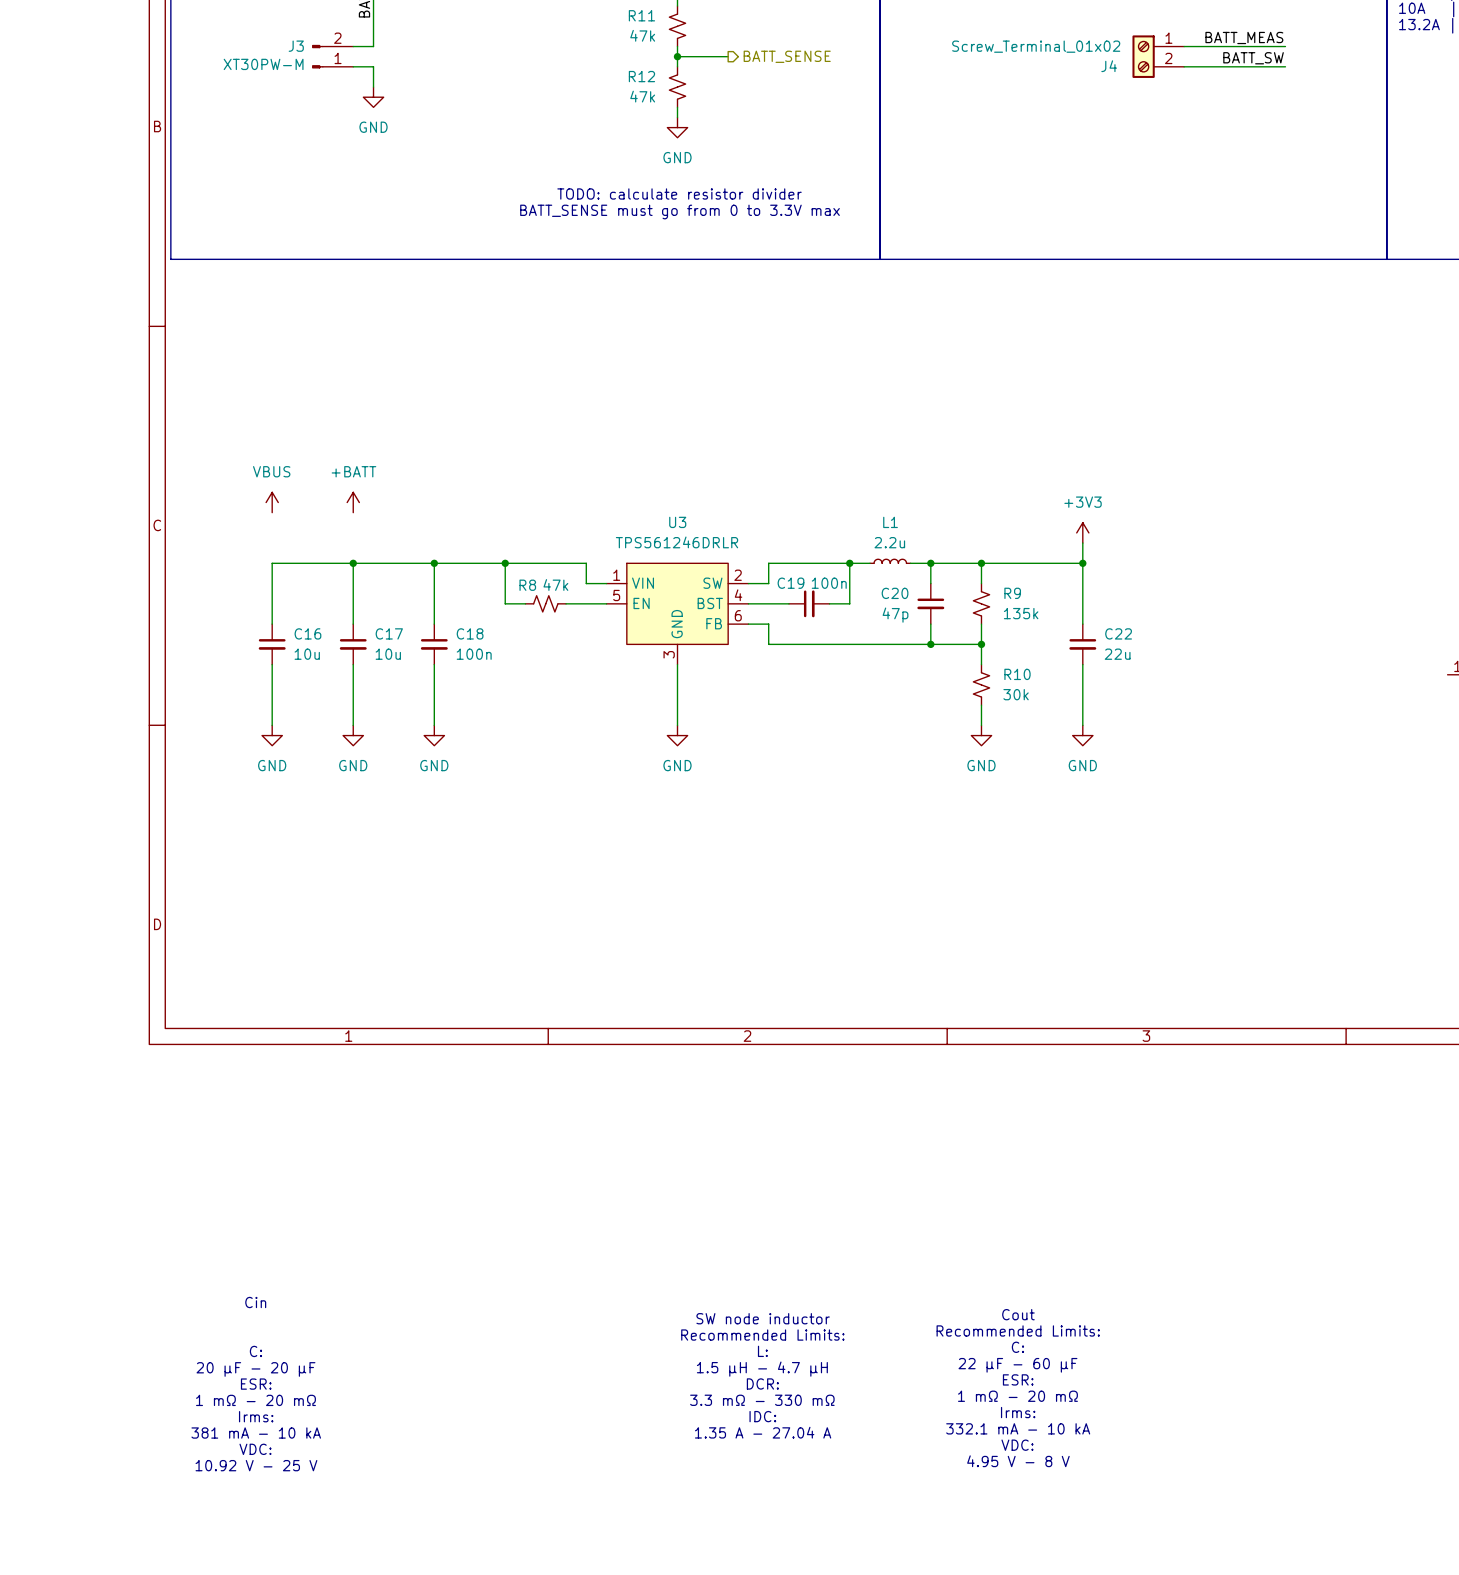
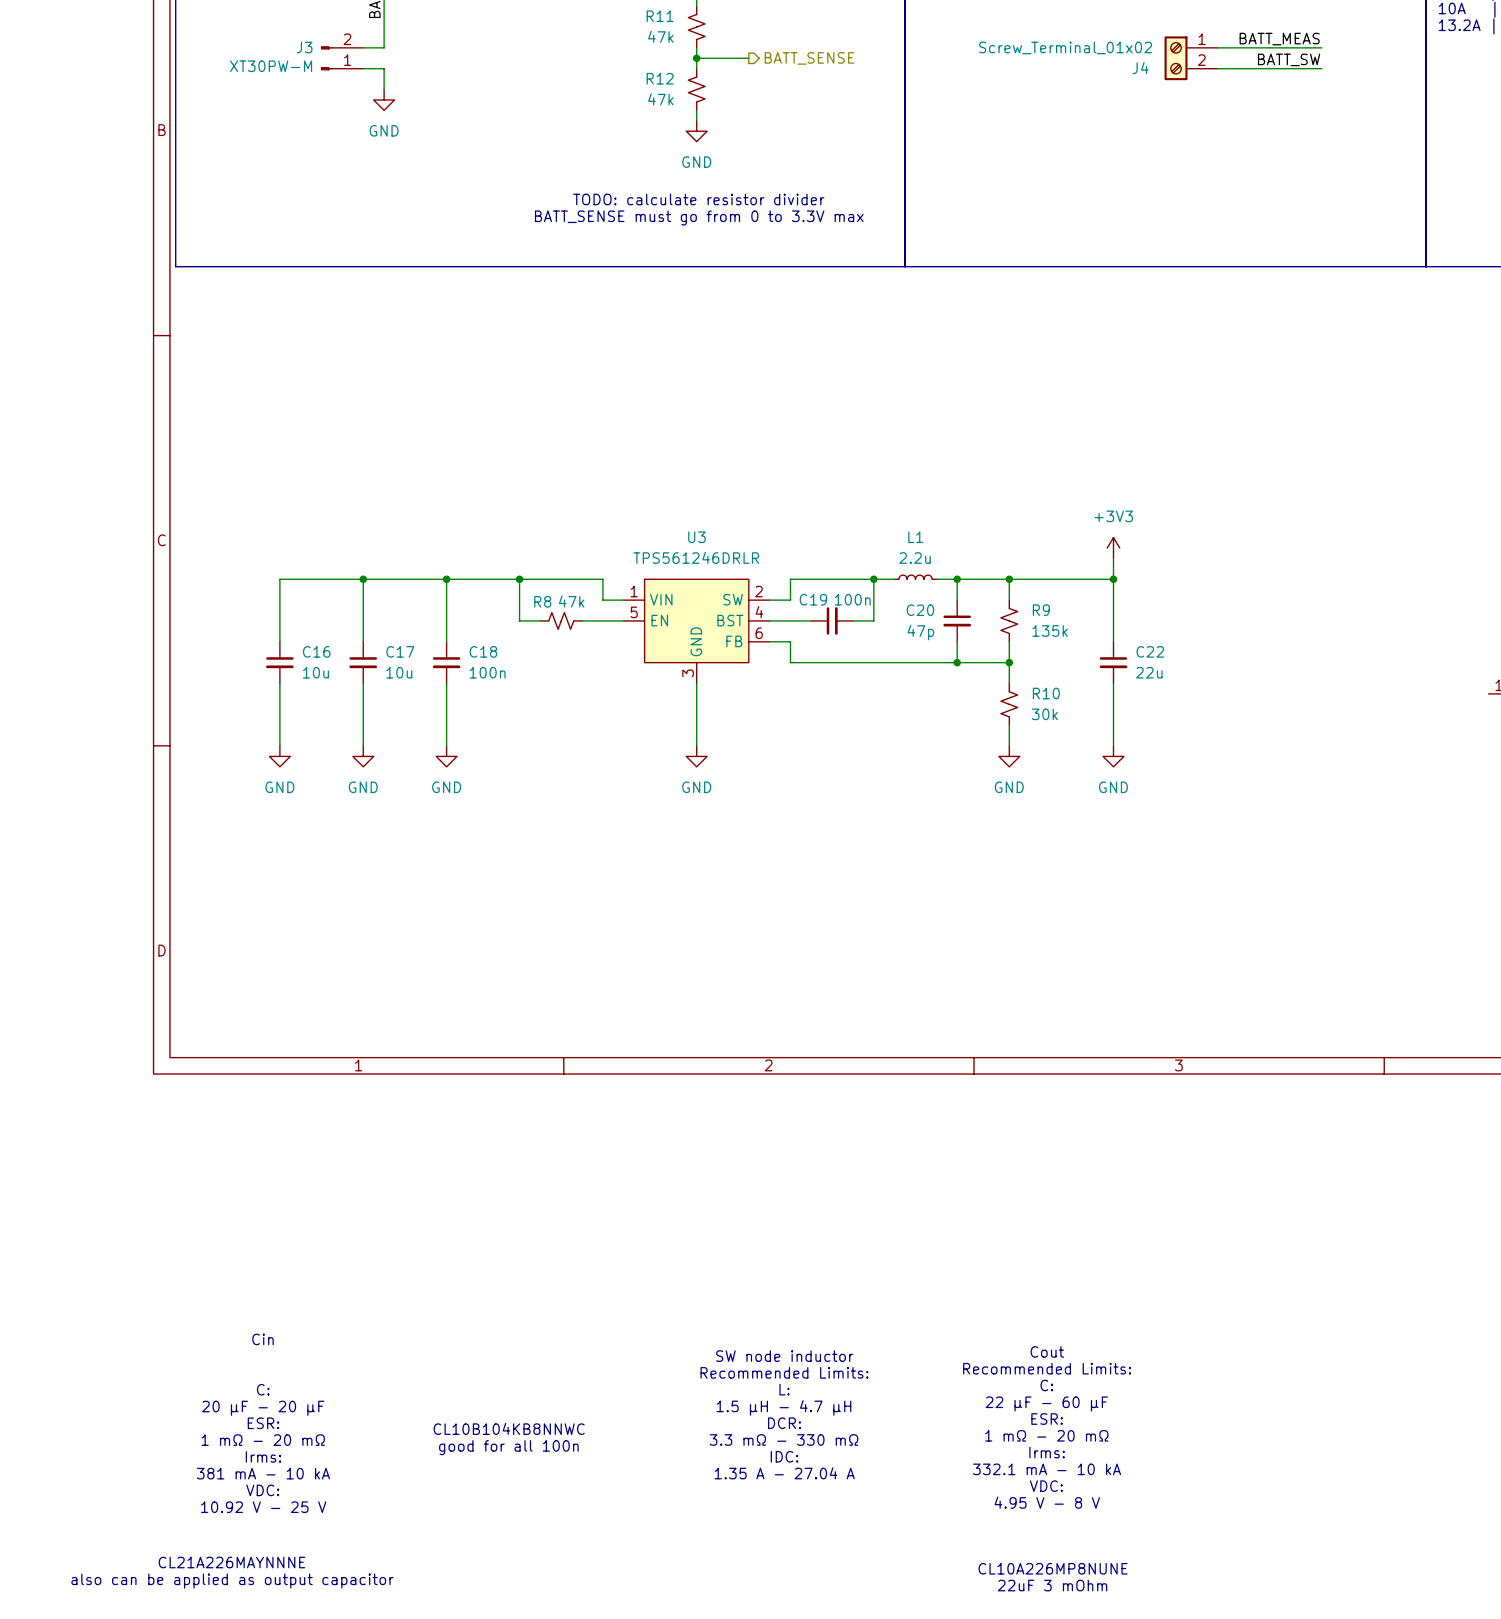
power symbol: VBUS (272, 502) -> none
power symbol: +BATT (353, 502) -> none
text: none -> CL10B104KB8NNWC (509, 1428)
text: none -> good for all 100n (508, 1447)
text: none -> CL21A226MAYNNNE (231, 1562)
text: none -> CL10A226MP8NUNE (1053, 1568)
text: none -> also can be applied as output capacitor (232, 1581)
text: none -> 22uF 3 mOhm (1052, 1585)

